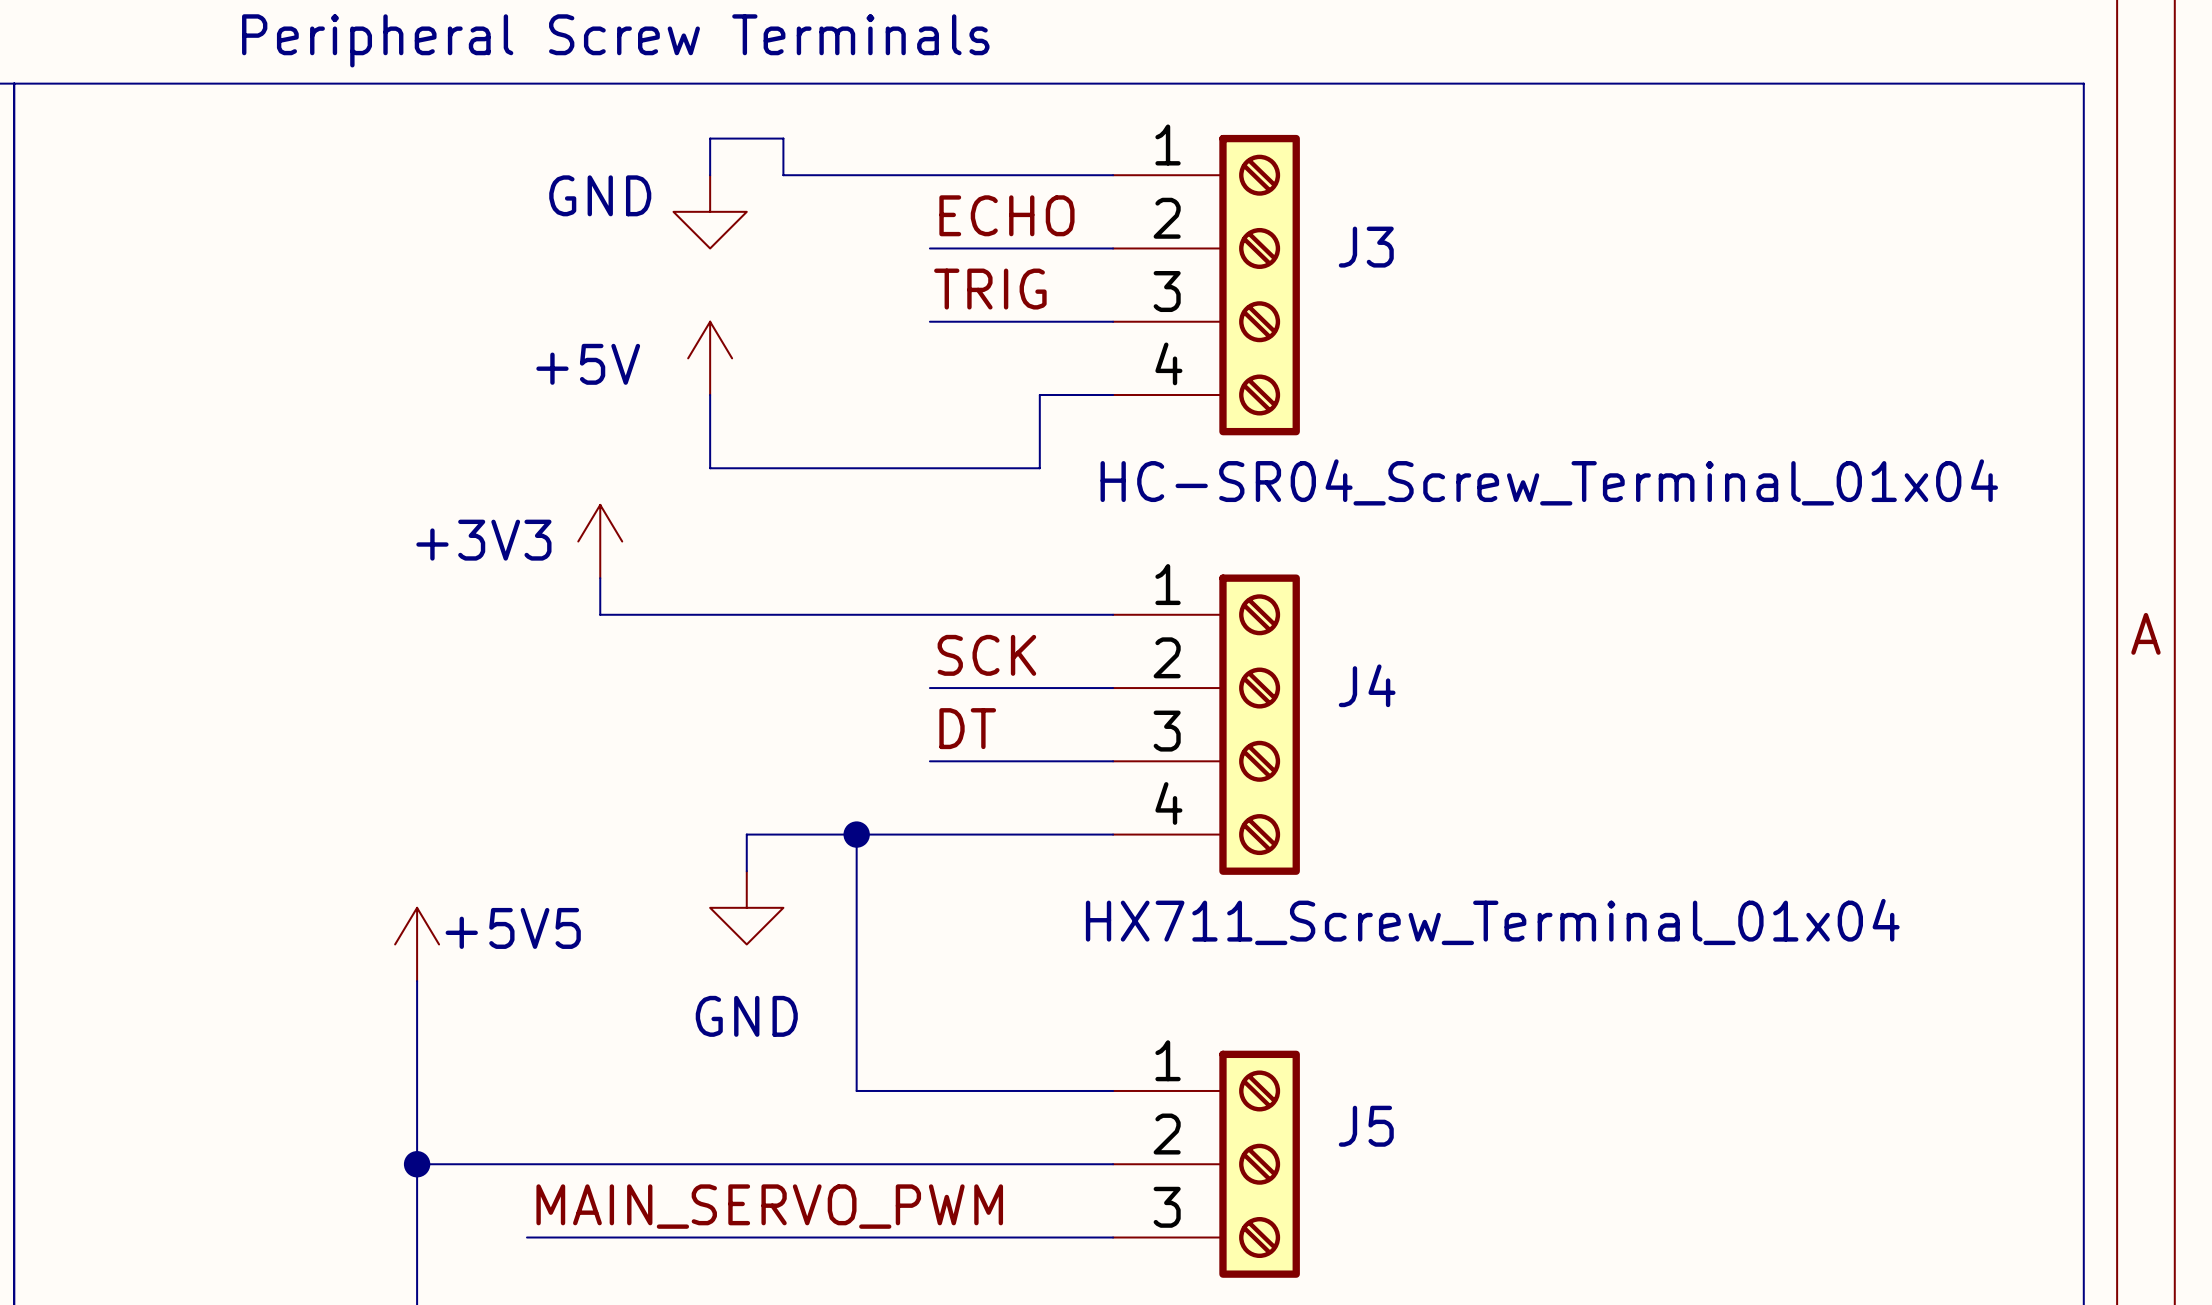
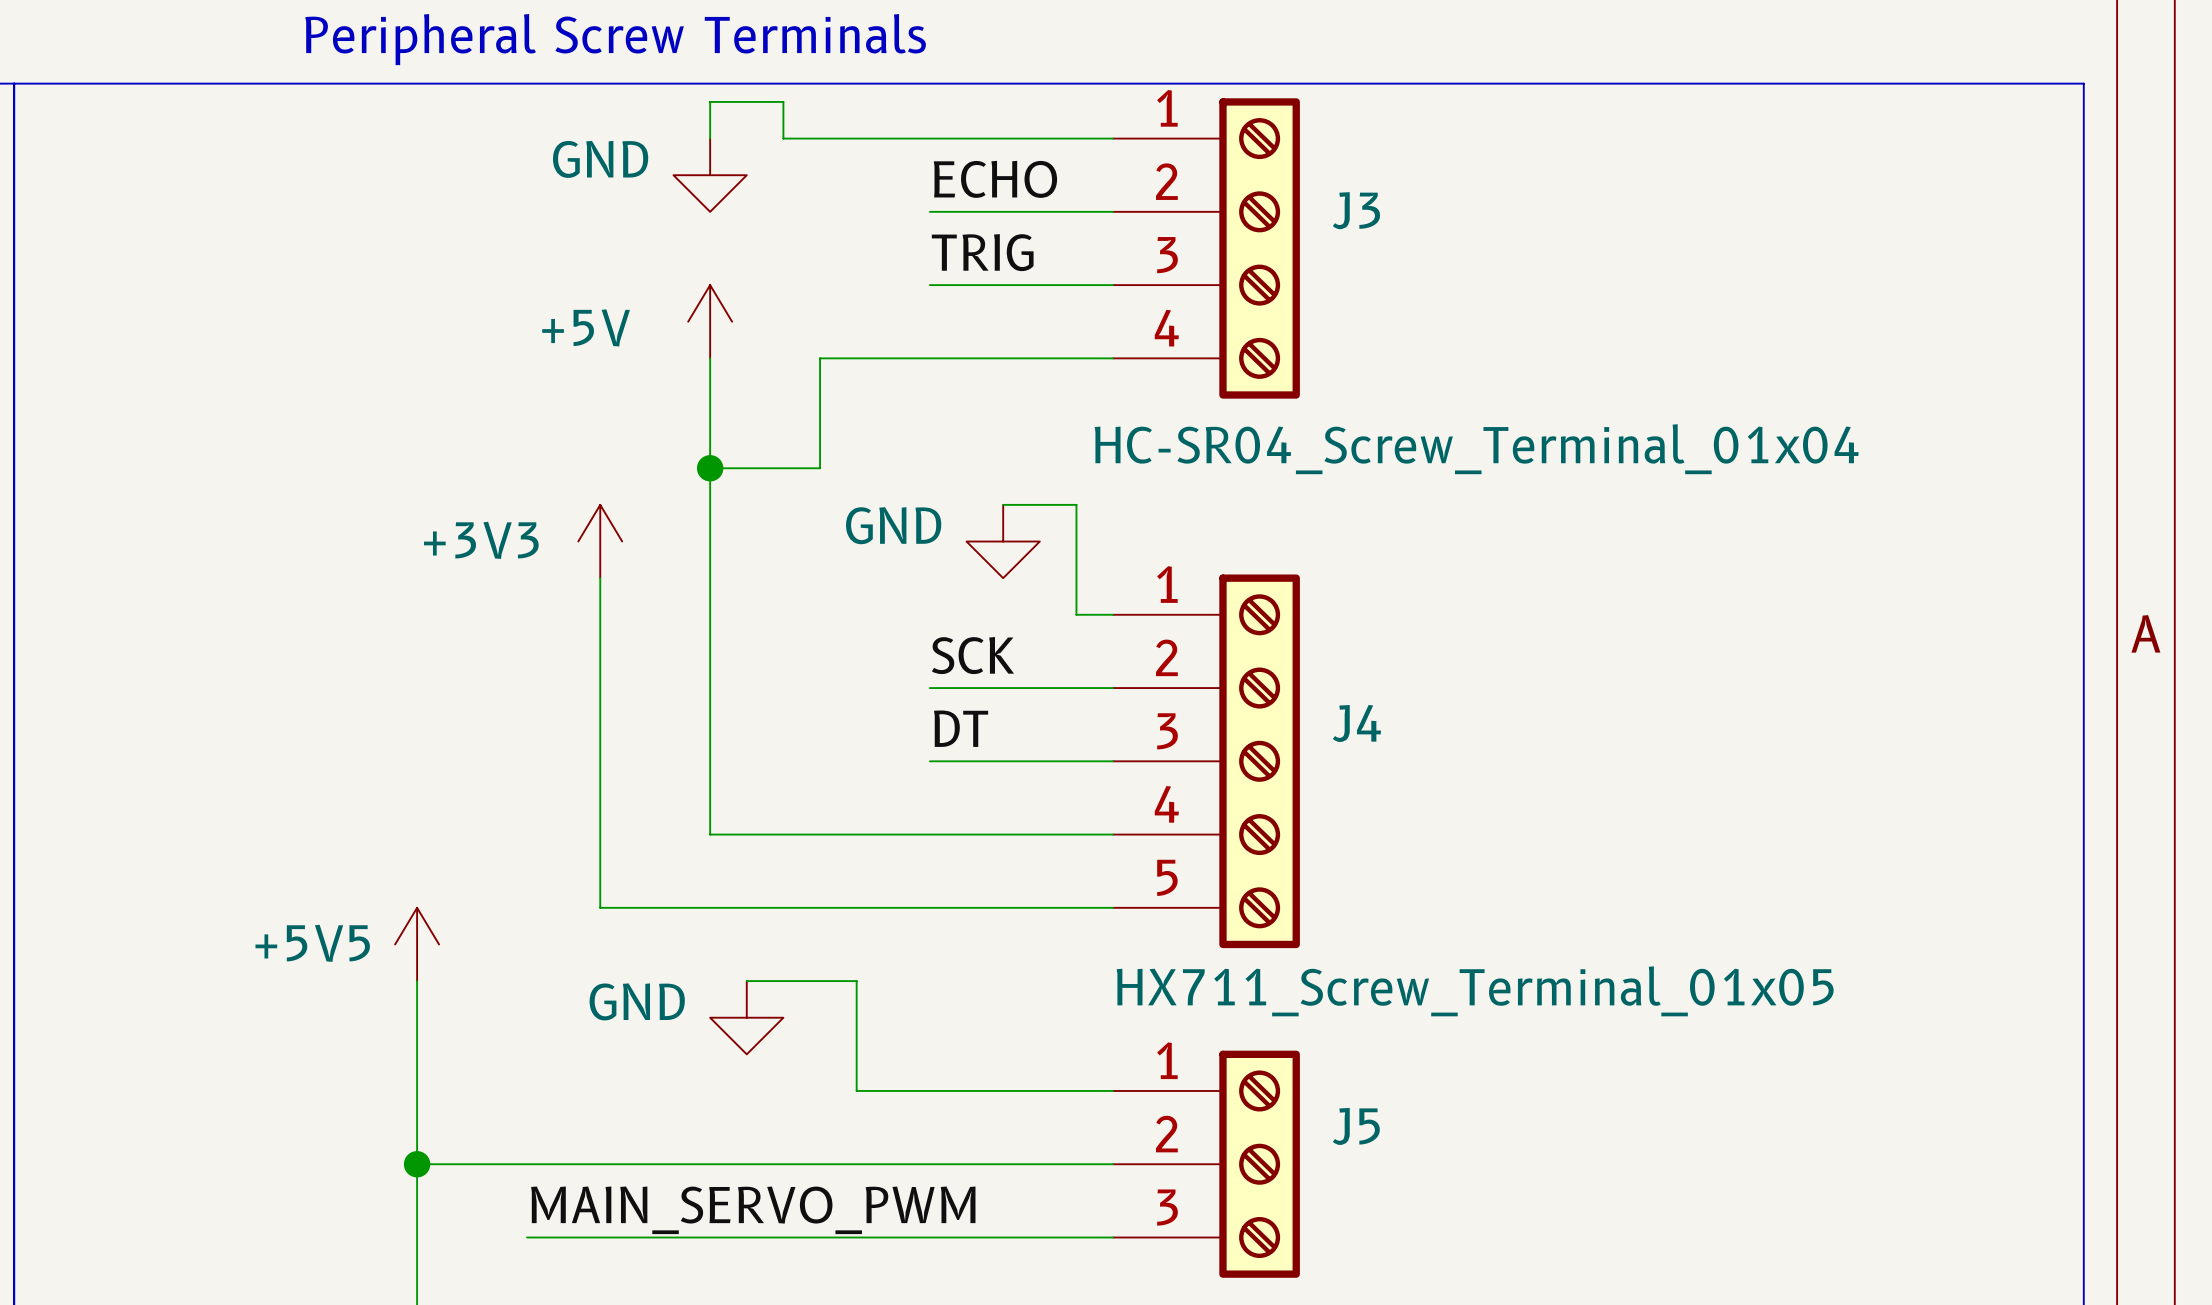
wire: (710, 175) (710, 138) (783, 138) (783, 175) (1113, 175) -> (710, 138) (710, 101) (783, 101) (783, 138) (1113, 138)
power symbol position: GND (710, 211) -> GND (710, 175)
label position: ECHO (1006, 215) -> ECHO (995, 179)
wire: (929, 248) (1113, 248) -> (929, 211) (1113, 211)
J3 position: (1206, 285) -> (1206, 248)
label position: TRIG (990, 289) -> TRIG (982, 252)
wire: (929, 321) (1113, 321) -> (929, 285) (1113, 285)
power symbol position: +5V (710, 358) -> +5V (710, 321)
wire: (1113, 394) (1039, 394) (1039, 468) (820, 468) -> (1113, 358) (820, 358) (820, 468)
junction: none -> (710, 468)
wire: none -> (1003, 504) (1076, 504) (1076, 614)
power symbol: none -> GND (1003, 541)
J4 symbol: [1113, 574, 1300, 875] -> [1113, 574, 1300, 949]
wire: (600, 614) (1076, 614) -> (600, 614) (600, 907) (1113, 907)
wire: (746, 834) (746, 871) -> (746, 834) (710, 834) (710, 468)
wire: (856, 834) (856, 981) -> (746, 981) (856, 981)
junction: (856, 834) -> none
power symbol position: GND (746, 907) -> GND (746, 1017)
J4 value: HX711_Screw_Terminal_01x04 (1492, 921) -> HX711_Screw_Terminal_01x05 (1475, 991)
power symbol text position: +5V5 (513, 928) -> +5V5 (312, 943)
power symbol text position: GND (746, 1016) -> GND (637, 1001)

